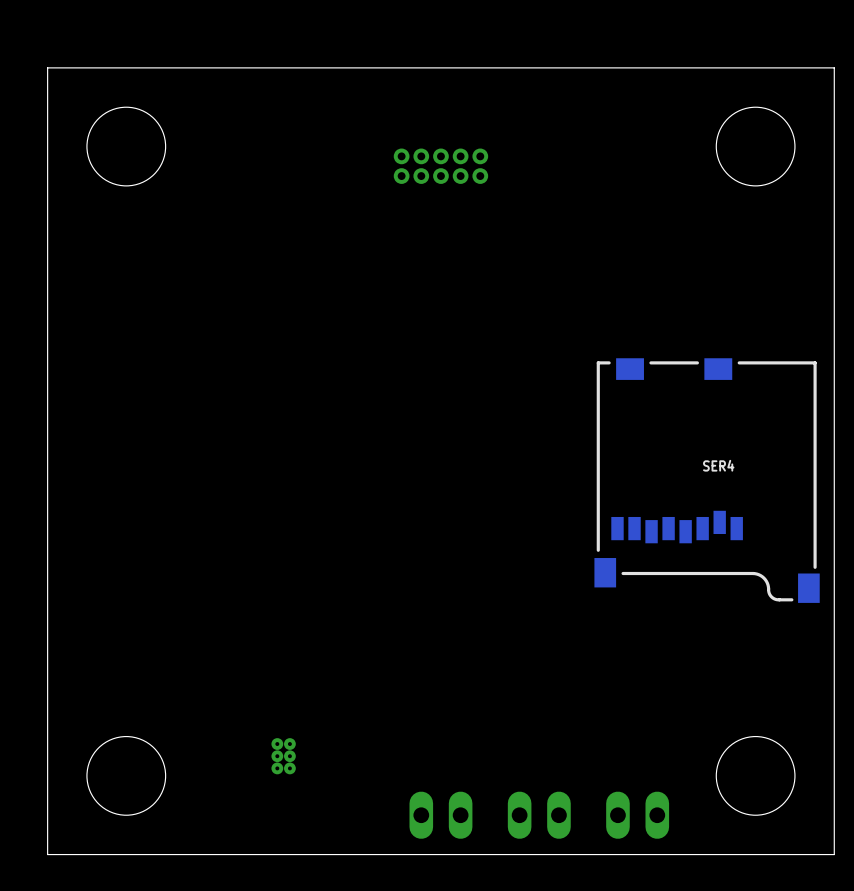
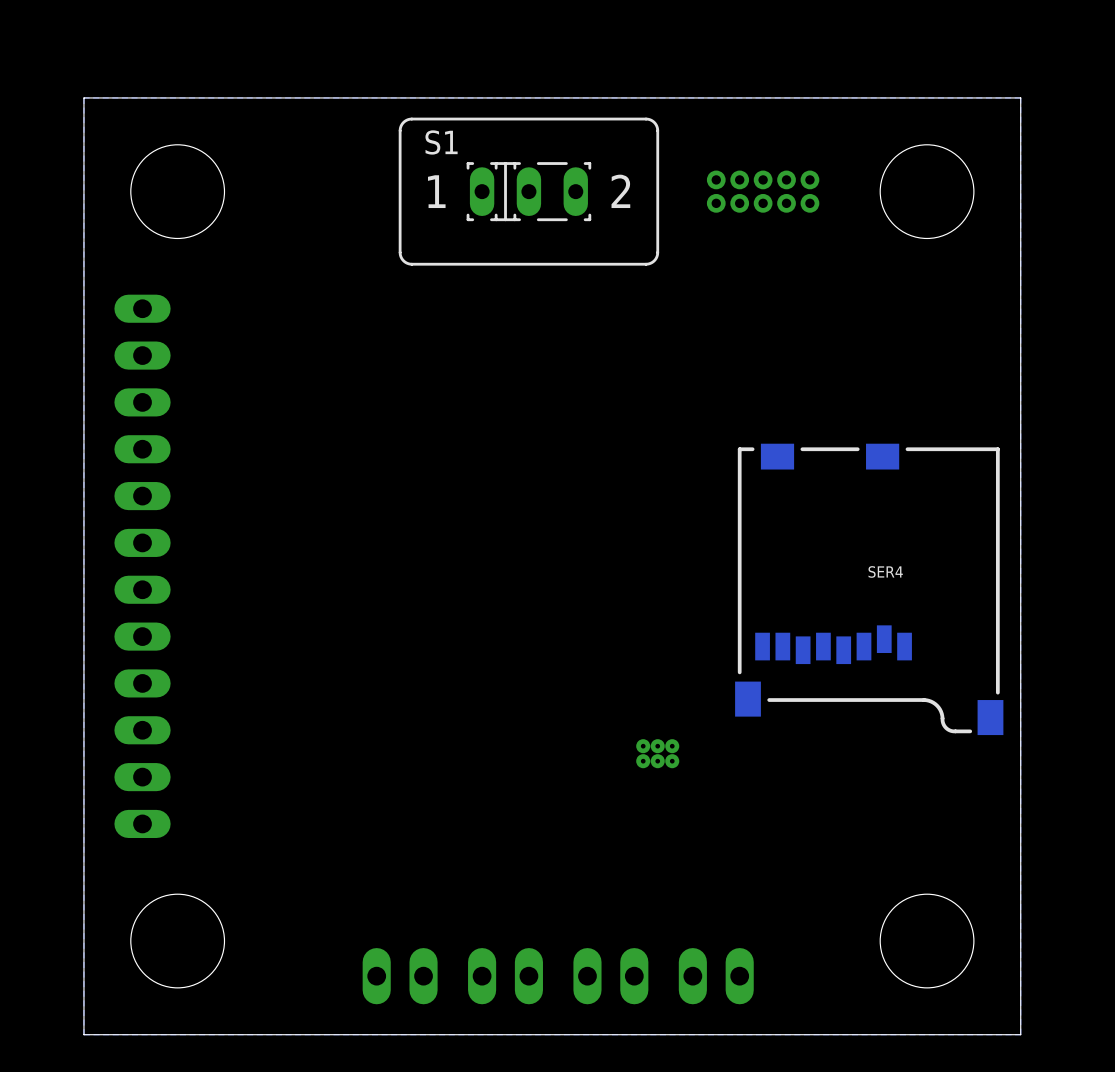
zone outline: none -> (1020, 97) (83, 97) (83, 1034) (1020, 1034) (1020, 97)
S1: none -> (528, 191)
part position: (440, 166) -> (763, 191)
part: none -> (142, 378)
part: none -> (142, 542)
part: none -> (142, 730)
part rotation: 0° (283, 756) -> 90° clockwise (657, 753)
part position: (283, 756) -> (657, 753)
part: none -> (400, 976)
part: none -> (505, 976)
part: none -> (610, 976)
part: none -> (716, 976)
part: (440, 815) -> none
part: (539, 815) -> none
part: (637, 815) -> none

